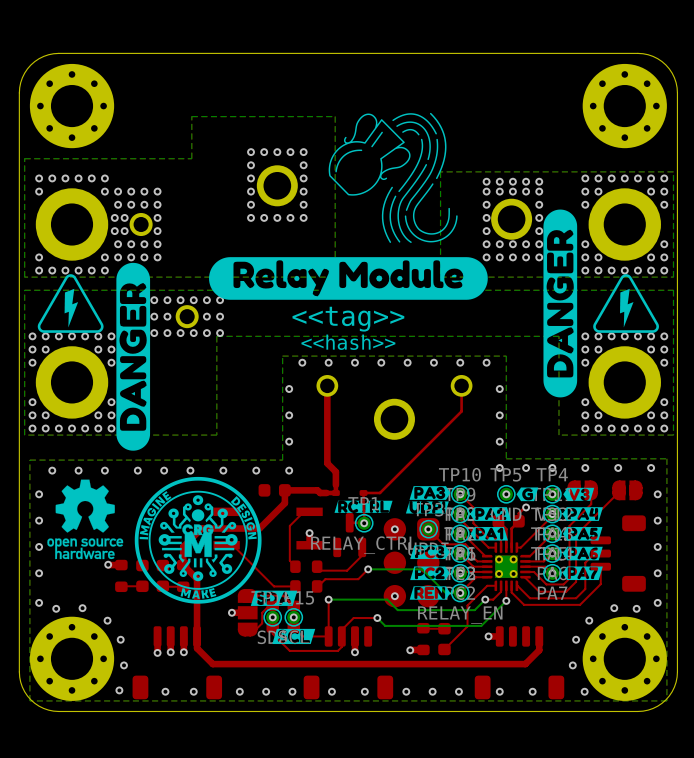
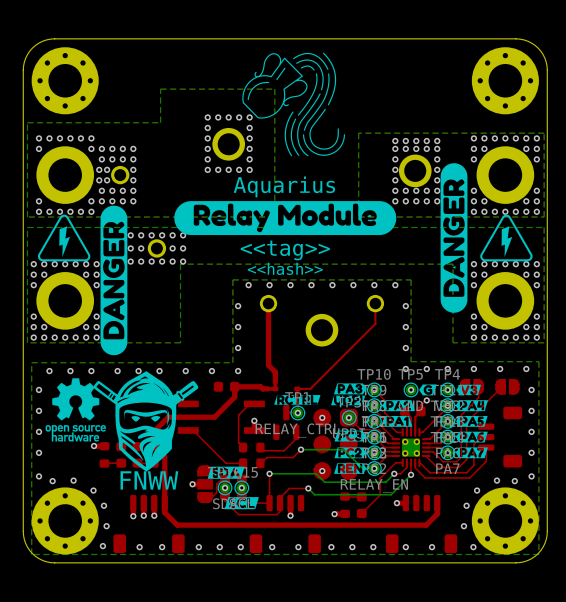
drawing position: (393, 177) -> (293, 104)
text: none -> Aquarius (284, 186)
drawing: none -> [93, 371, 199, 472]
drawing: [134, 476, 262, 604] -> none
text: none -> FNWW (149, 480)

